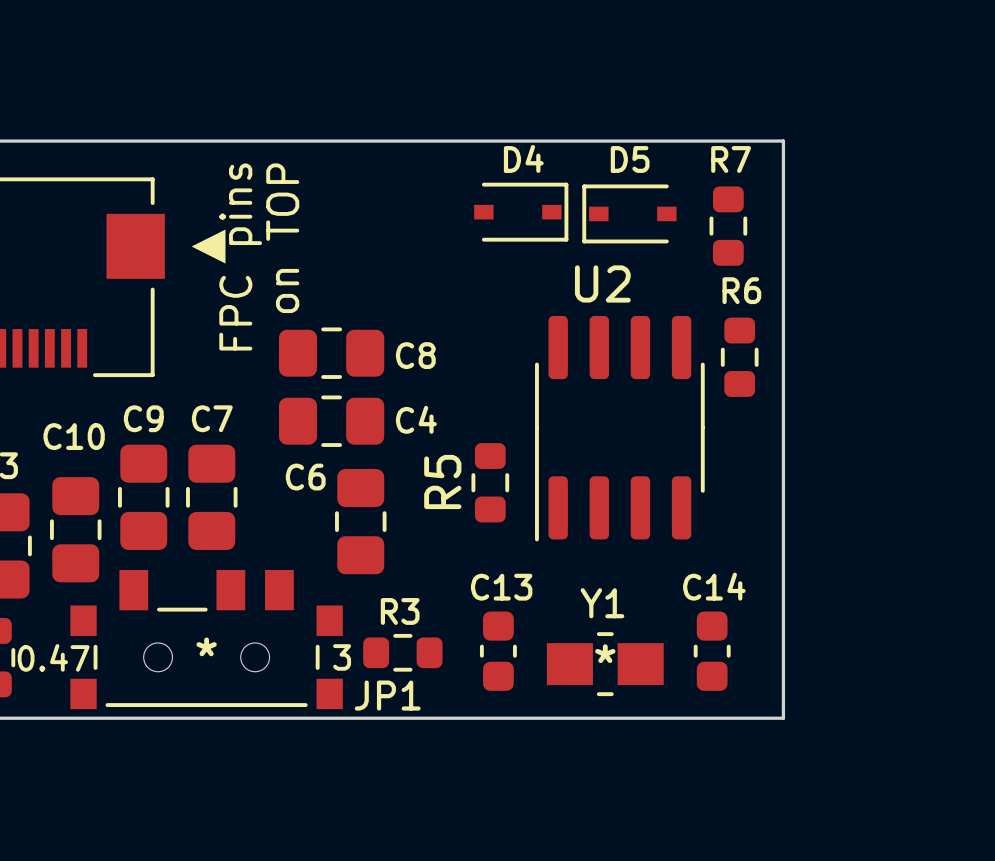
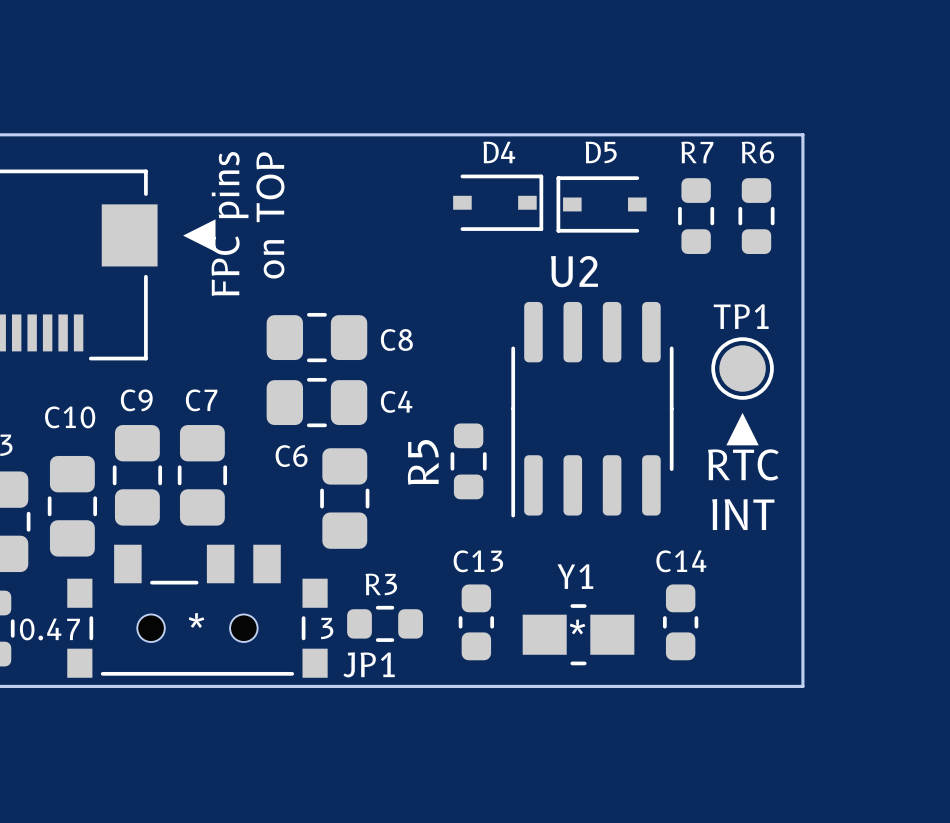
board edge: (783, 141) (783, 718) -> (748, 134) (802, 134) (802, 686) (748, 686)
R6 position: (739, 357) -> (756, 216)
TP1: none -> (742, 368)
text: none -> ▲ (742, 429)
text: none -> RTC (743, 464)
text: none -> INT (743, 514)

